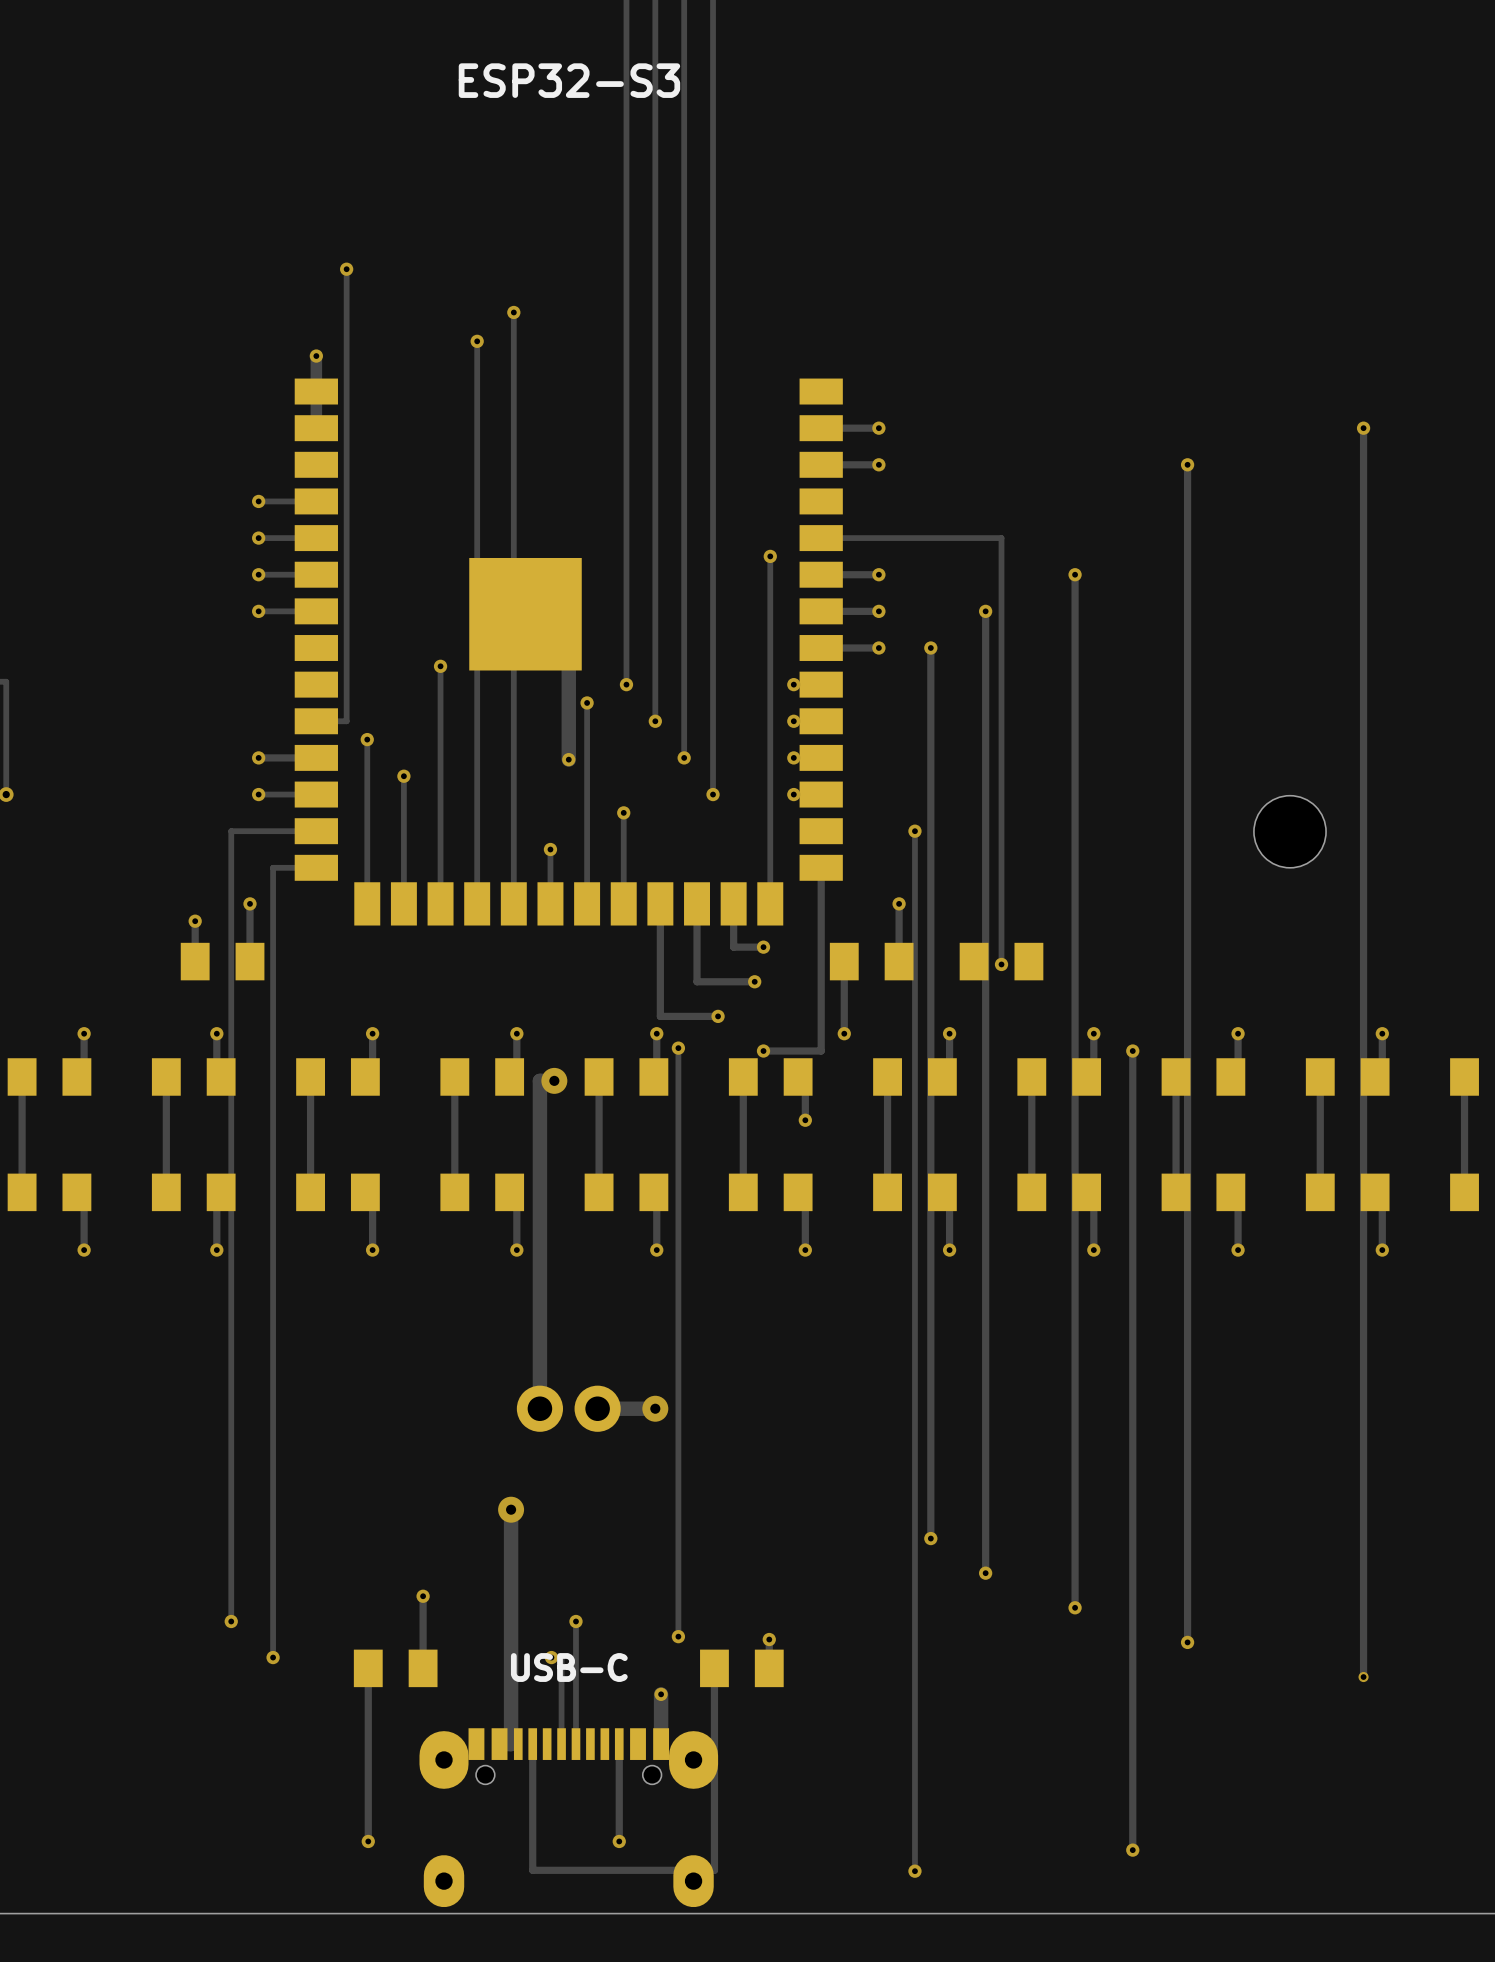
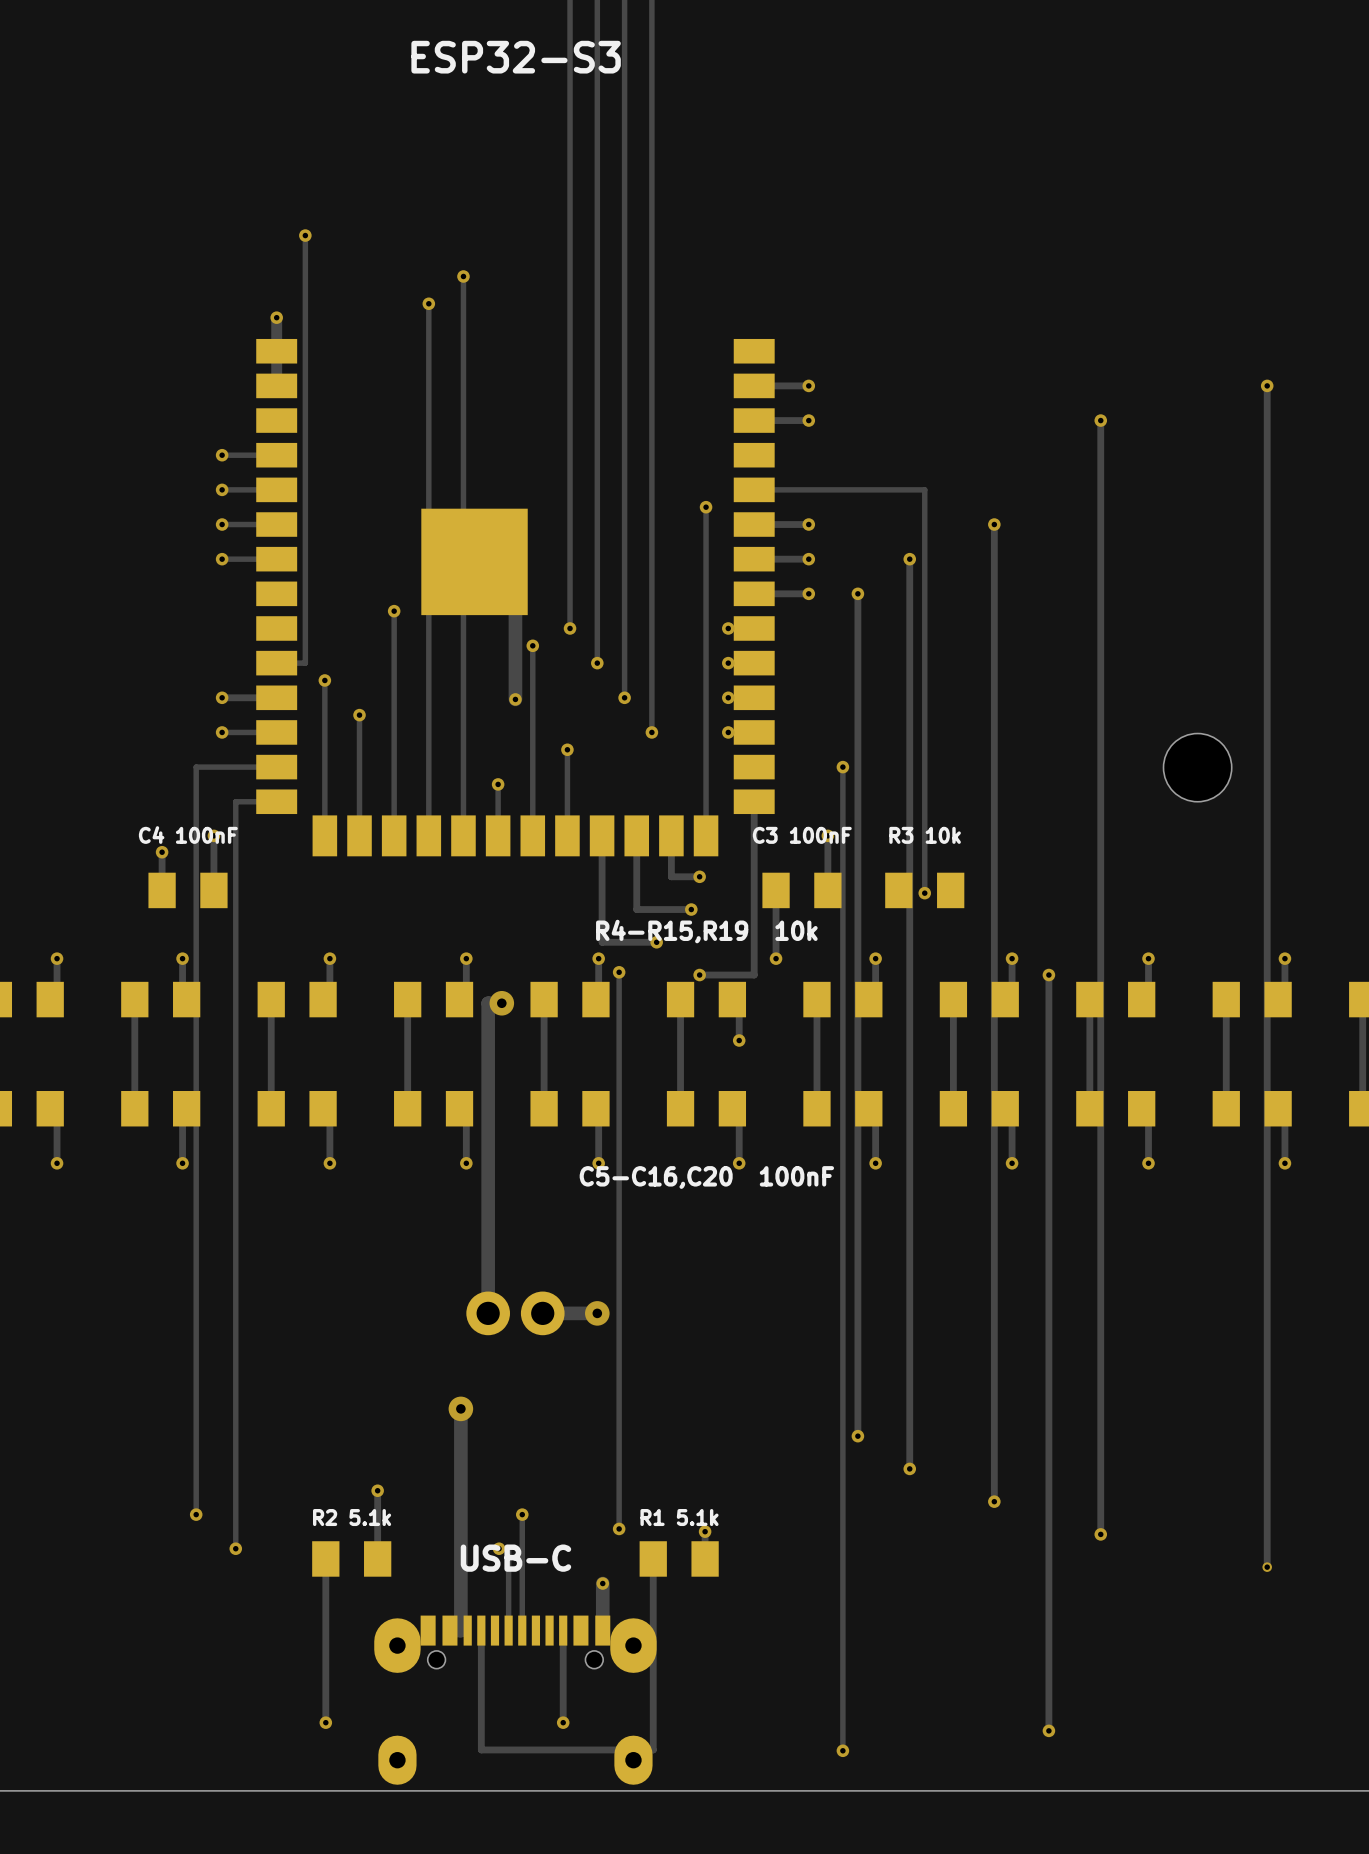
text: none -> C4 100nF (188, 835)
text: none -> C3 100nF (802, 835)
text: none -> R3 10k (925, 835)
text: none -> R4-R15,R19 10k (706, 931)
text: none -> C5-C16,C20 100nF (706, 1177)
text: none -> R2 5.1k (352, 1517)
text: none -> R1 5.1k (679, 1517)

